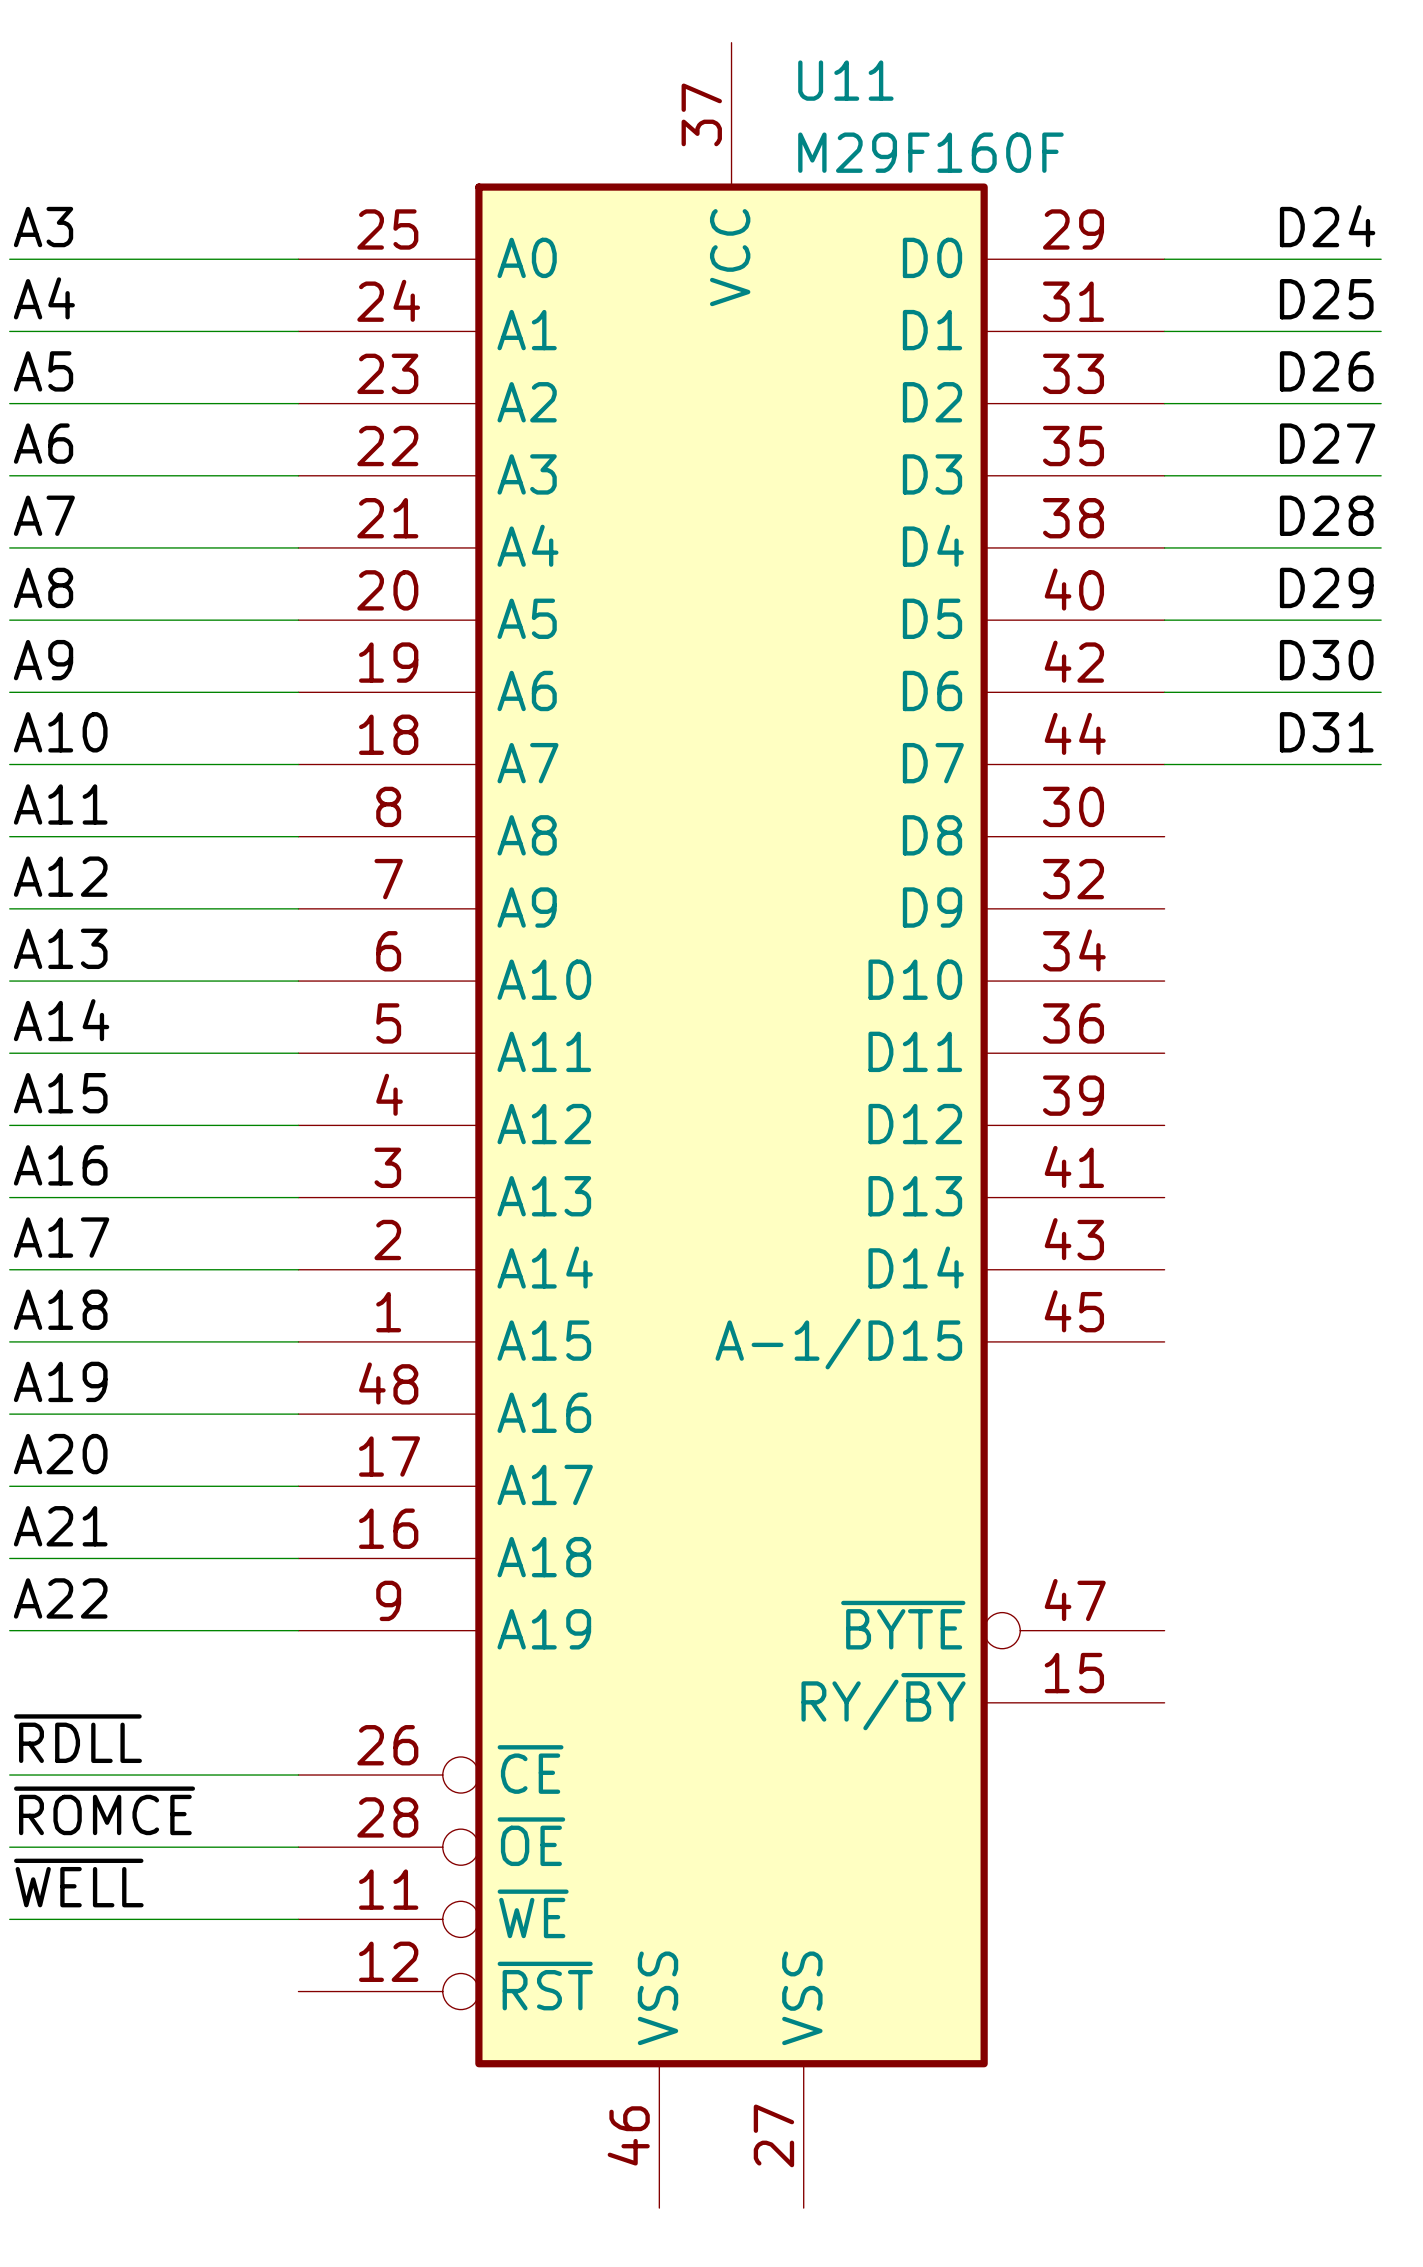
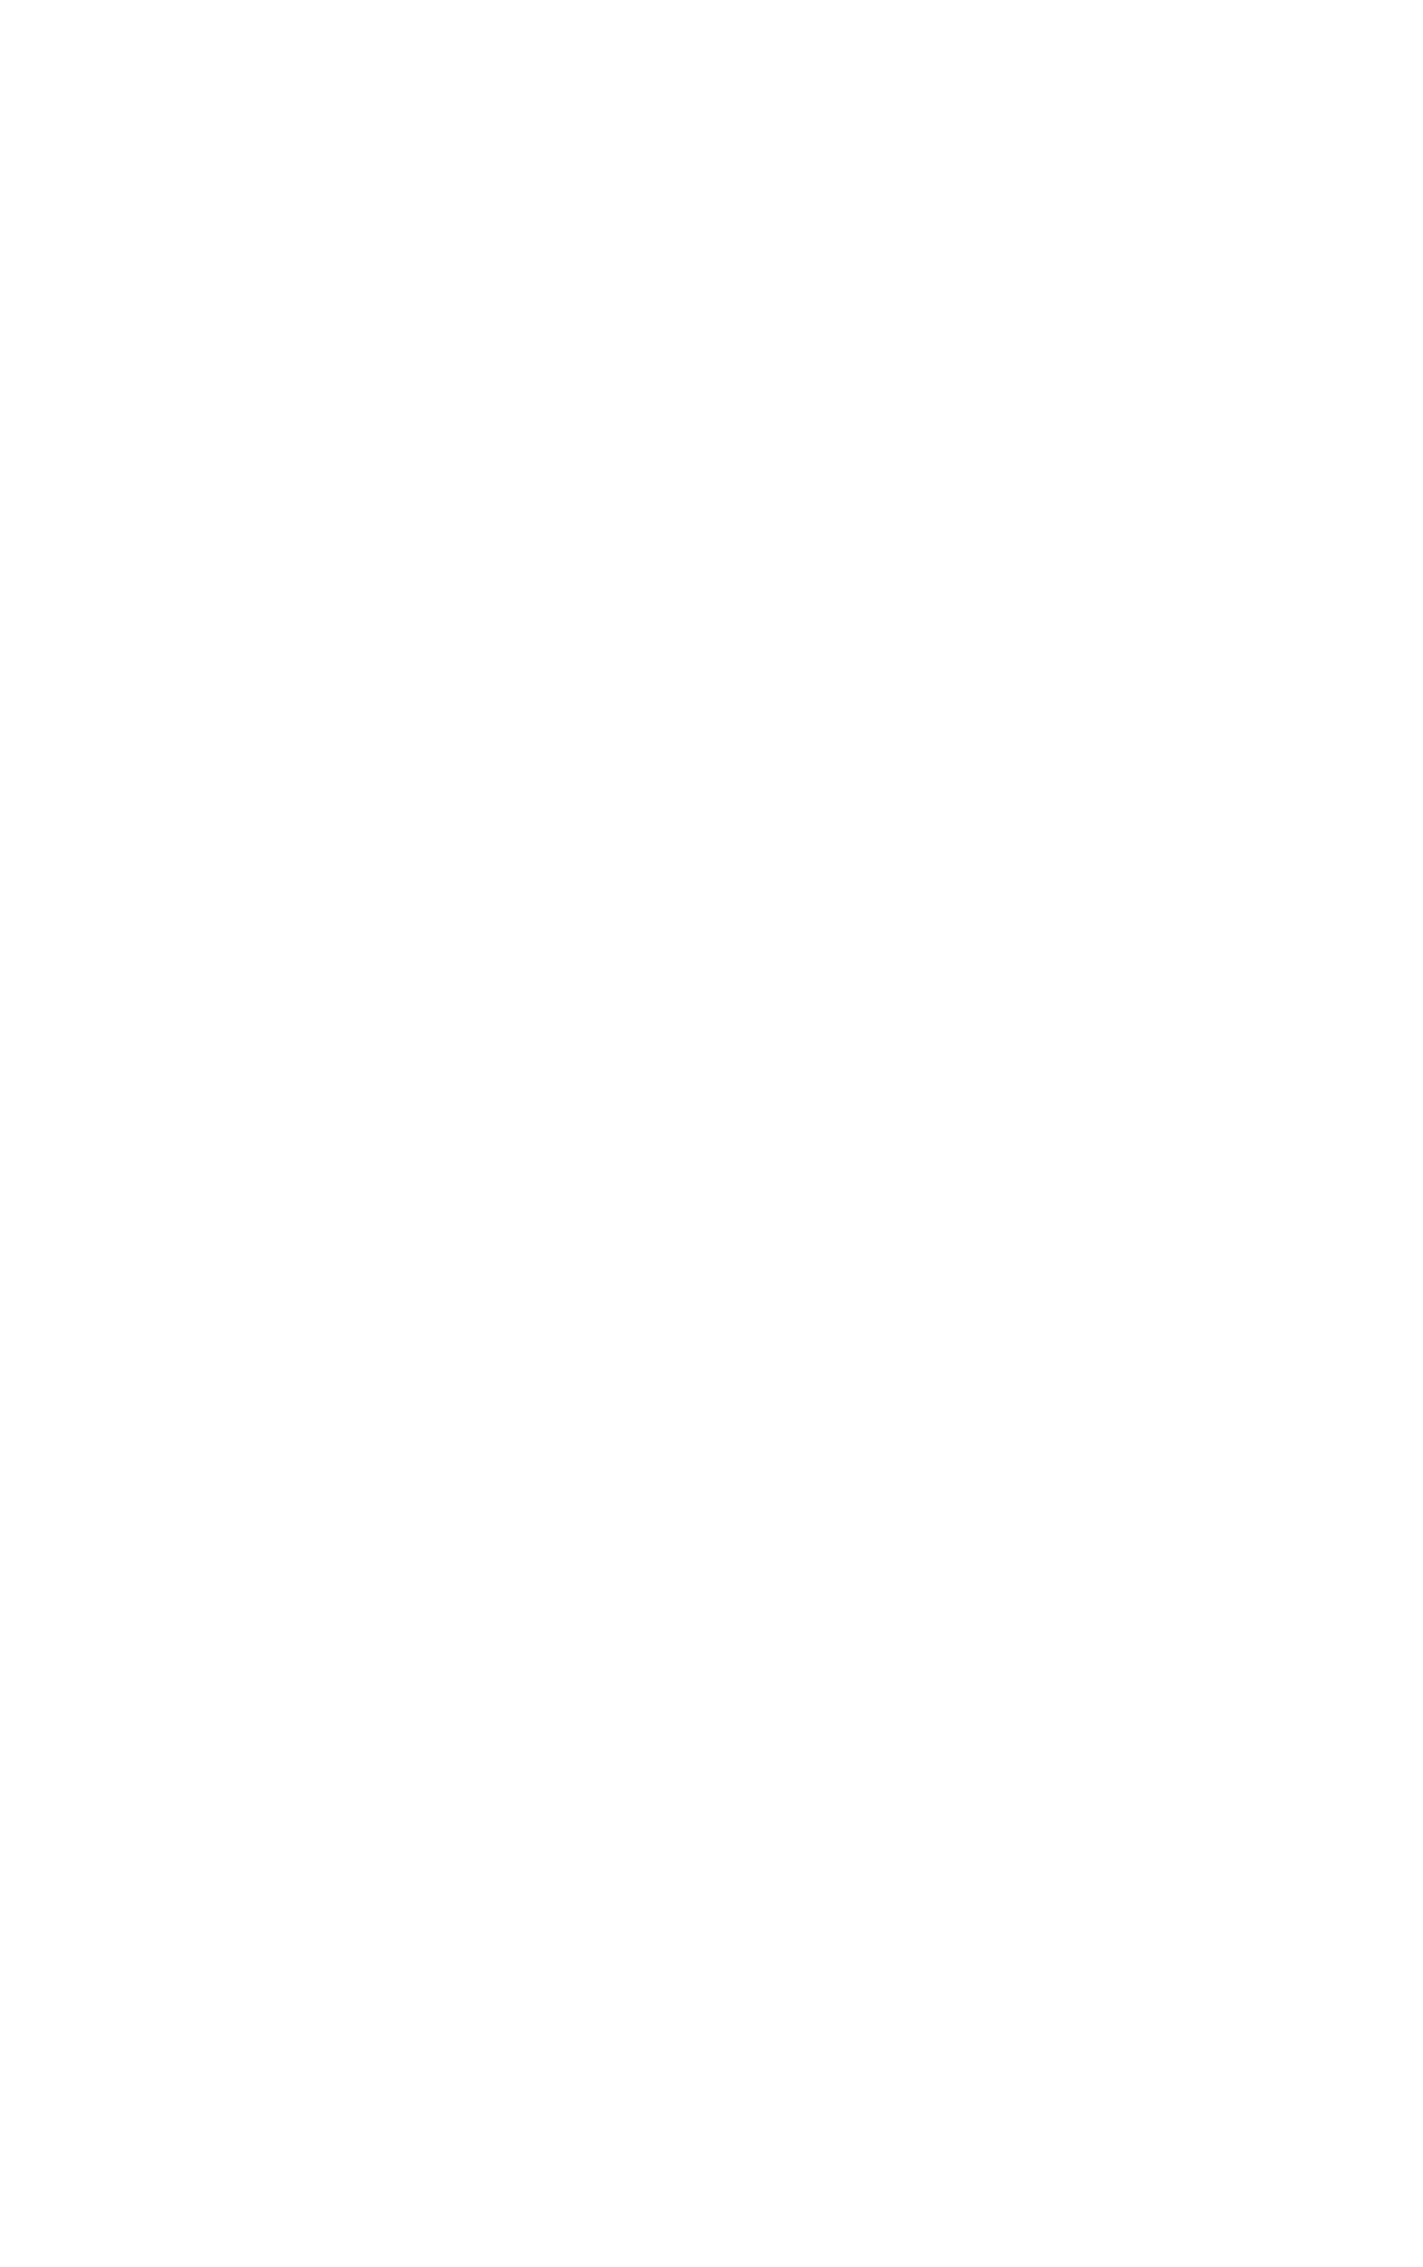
label: D24 (1327, 226) -> none
label: A3 (43, 227) -> none
wire: (9, 259) (298, 259) -> none
wire: (1164, 259) (1381, 259) -> none
label: A4 (44, 298) -> none
label: D25 (1326, 299) -> none
wire: (9, 331) (298, 331) -> none
wire: (1164, 331) (1381, 331) -> none
label: A5 (43, 371) -> none
label: D26 (1326, 371) -> none
wire: (9, 403) (298, 403) -> none
wire: (1164, 403) (1381, 403) -> none
label: A6 (43, 443) -> none
label: D27 (1327, 443) -> none
wire: (9, 475) (298, 475) -> none
wire: (1164, 475) (1381, 475) -> none
label: A7 (44, 515) -> none
label: D28 (1326, 515) -> none
wire: (9, 547) (298, 547) -> none
wire: (1164, 547) (1381, 547) -> none
label: A8 (43, 587) -> none
label: D29 (1326, 587) -> none
wire: (9, 620) (298, 620) -> none
wire: (1164, 620) (1381, 620) -> none
label: A9 (43, 660) -> none
label: D30 (1326, 660) -> none
wire: (9, 692) (298, 692) -> none
wire: (1164, 692) (1381, 692) -> none
label: A10 (60, 732) -> none
label: D31 (1326, 732) -> none
wire: (9, 764) (298, 764) -> none
wire: (1164, 764) (1381, 764) -> none
label: A11 (60, 804) -> none
wire: (9, 836) (298, 836) -> none
label: A12 (60, 876) -> none
wire: (9, 908) (298, 908) -> none
label: A13 (60, 948) -> none
wire: (9, 981) (298, 981) -> none
label: A14 (61, 1020) -> none
wire: (9, 1053) (298, 1053) -> none
label: A15 (60, 1093) -> none
wire: (9, 1125) (298, 1125) -> none
U11: M29F160F (731, 1125) -> none
label: A16 (60, 1165) -> none
wire: (9, 1197) (298, 1197) -> none
label: A17 (61, 1237) -> none
wire: (9, 1269) (298, 1269) -> none
label: A18 (60, 1309) -> none
wire: (9, 1341) (298, 1341) -> none
label: A19 (60, 1381) -> none
wire: (9, 1414) (298, 1414) -> none
label: A20 (60, 1454) -> none
wire: (9, 1486) (298, 1486) -> none
label: A21 (60, 1526) -> none
wire: (9, 1558) (298, 1558) -> none
label: A22 (60, 1598) -> none
wire: (9, 1630) (298, 1630) -> none
label: ~{RDLL} (77, 1738) -> none
wire: (9, 1775) (298, 1775) -> none
label: ~{ROMCE} (104, 1810) -> none
wire: (9, 1847) (298, 1847) -> none
label: ~{WELL} (78, 1883) -> none
wire: (9, 1919) (298, 1919) -> none

